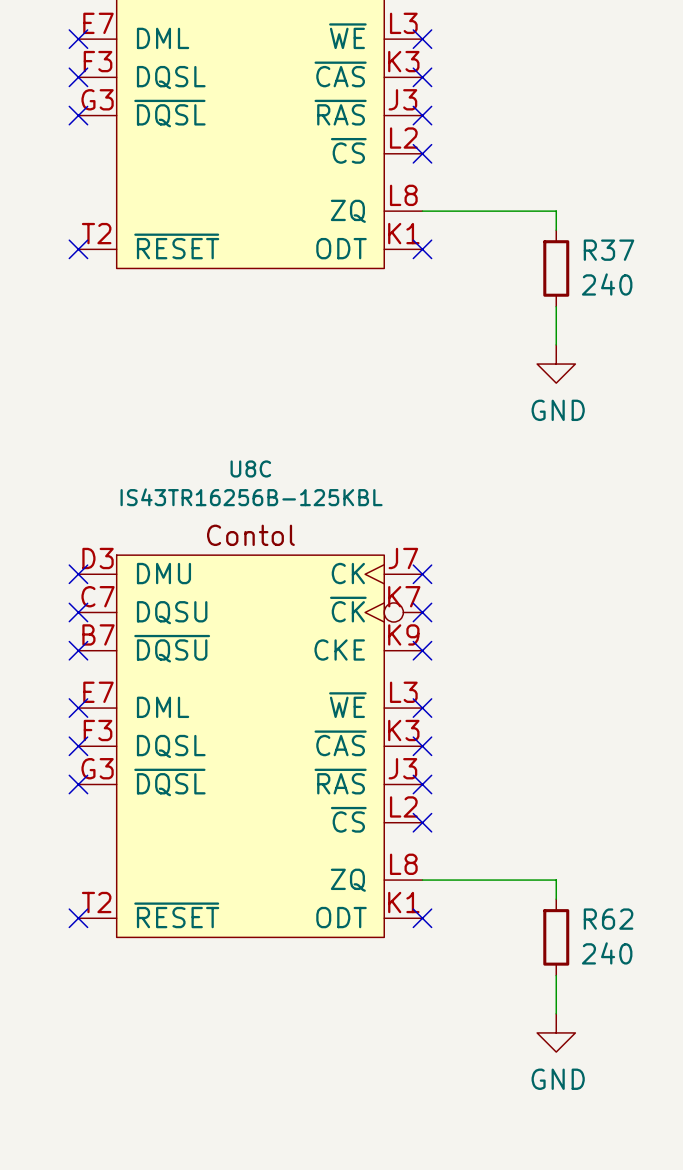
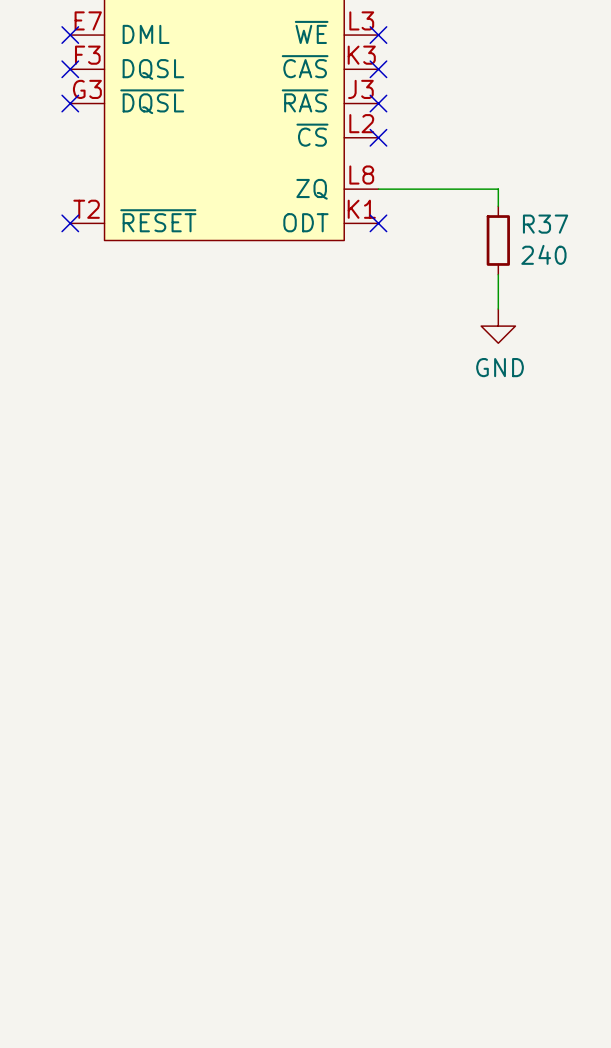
no-connect mark: (78, 574) -> none
no-connect mark: (422, 574) -> none
no-connect mark: (78, 612) -> none
no-connect mark: (422, 612) -> none
no-connect mark: (78, 650) -> none
no-connect mark: (422, 650) -> none
no-connect mark: (78, 708) -> none
no-connect mark: (422, 708) -> none
no-connect mark: (78, 746) -> none
U8C: IS43TR16256B-125KBL (250, 746) -> none
no-connect mark: (422, 746) -> none
no-connect mark: (78, 784) -> none
no-connect mark: (422, 784) -> none
no-connect mark: (422, 822) -> none
wire: (422, 880) (556, 880) (556, 899) -> none
no-connect mark: (78, 918) -> none
no-connect mark: (422, 918) -> none
R62: 240 (556, 937) -> none
wire: (556, 975) (556, 1013) -> none
power symbol: GND (556, 1032) -> none

